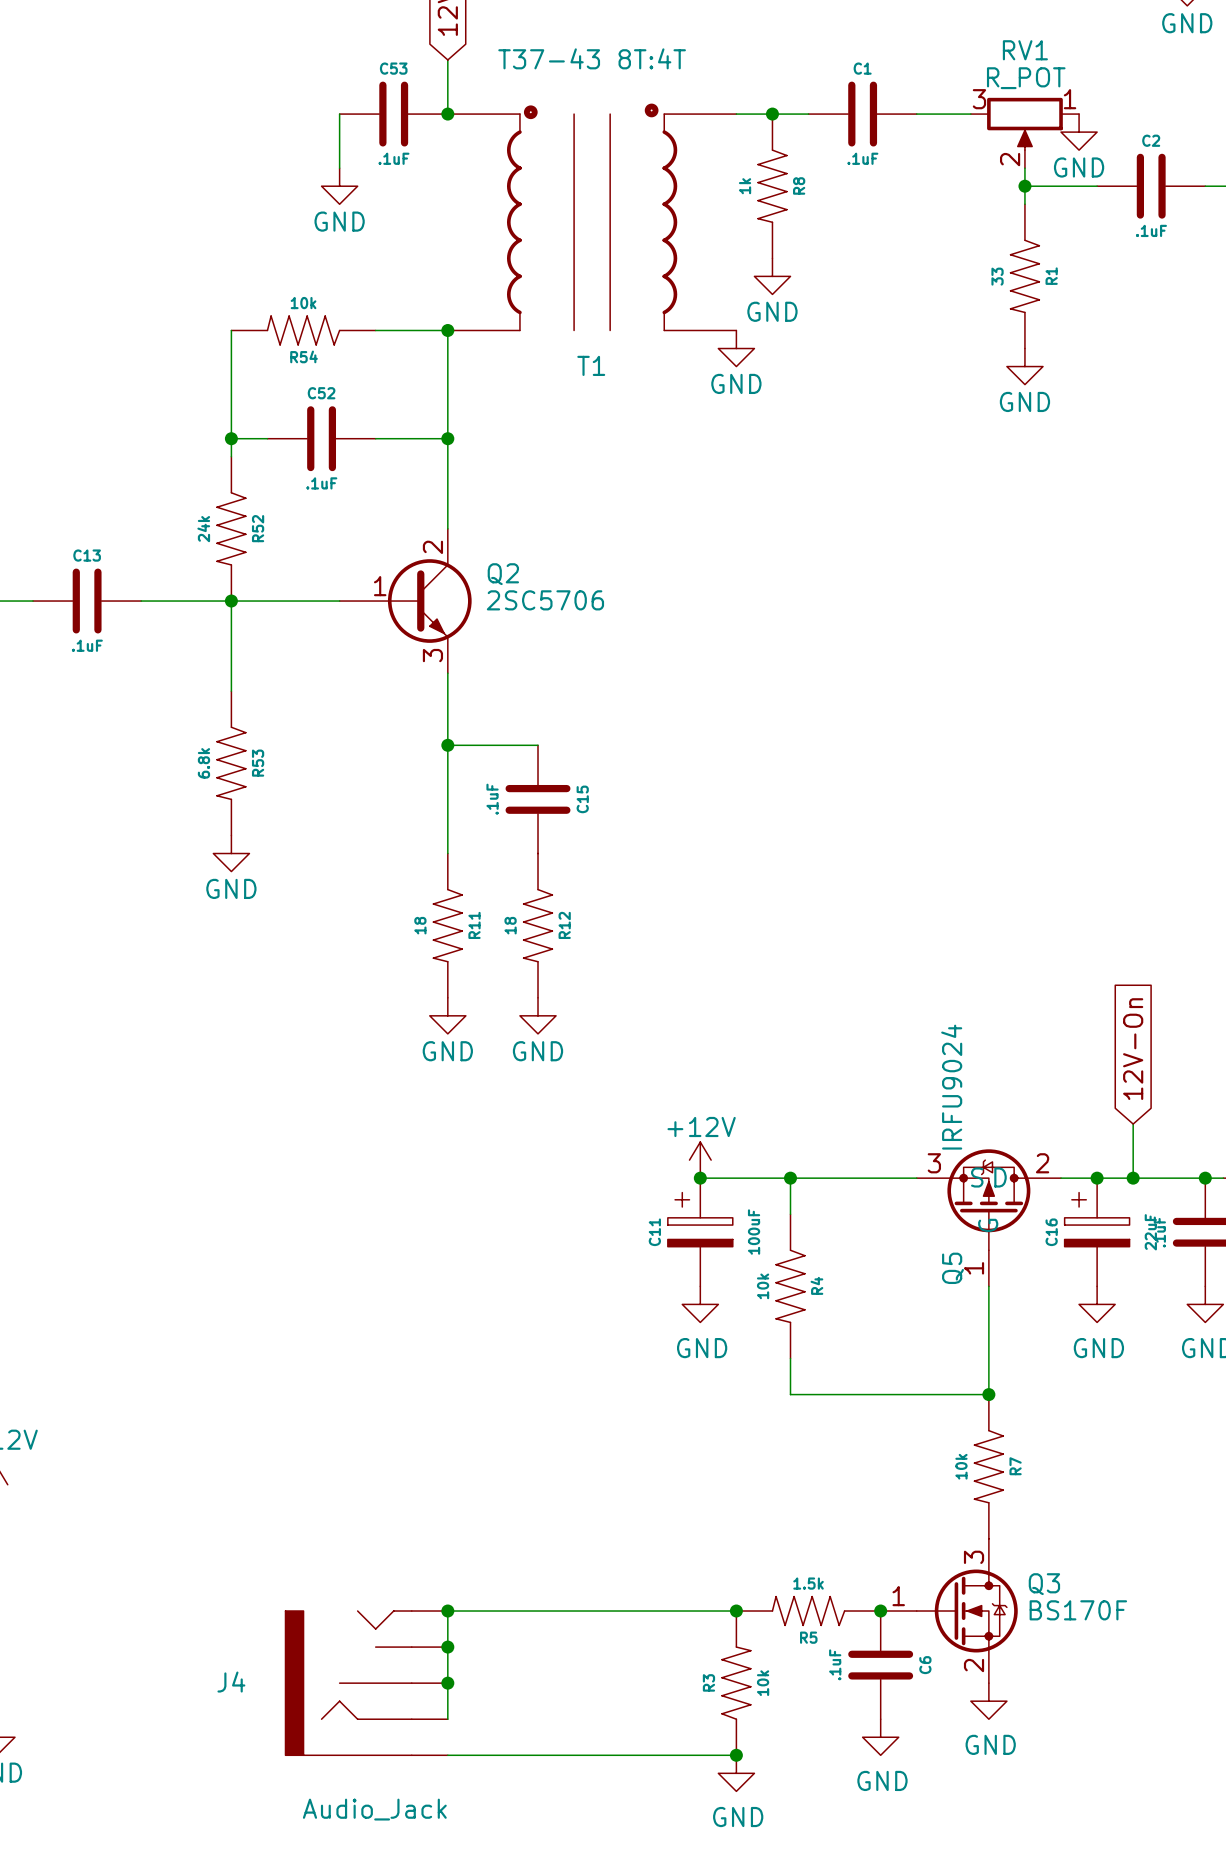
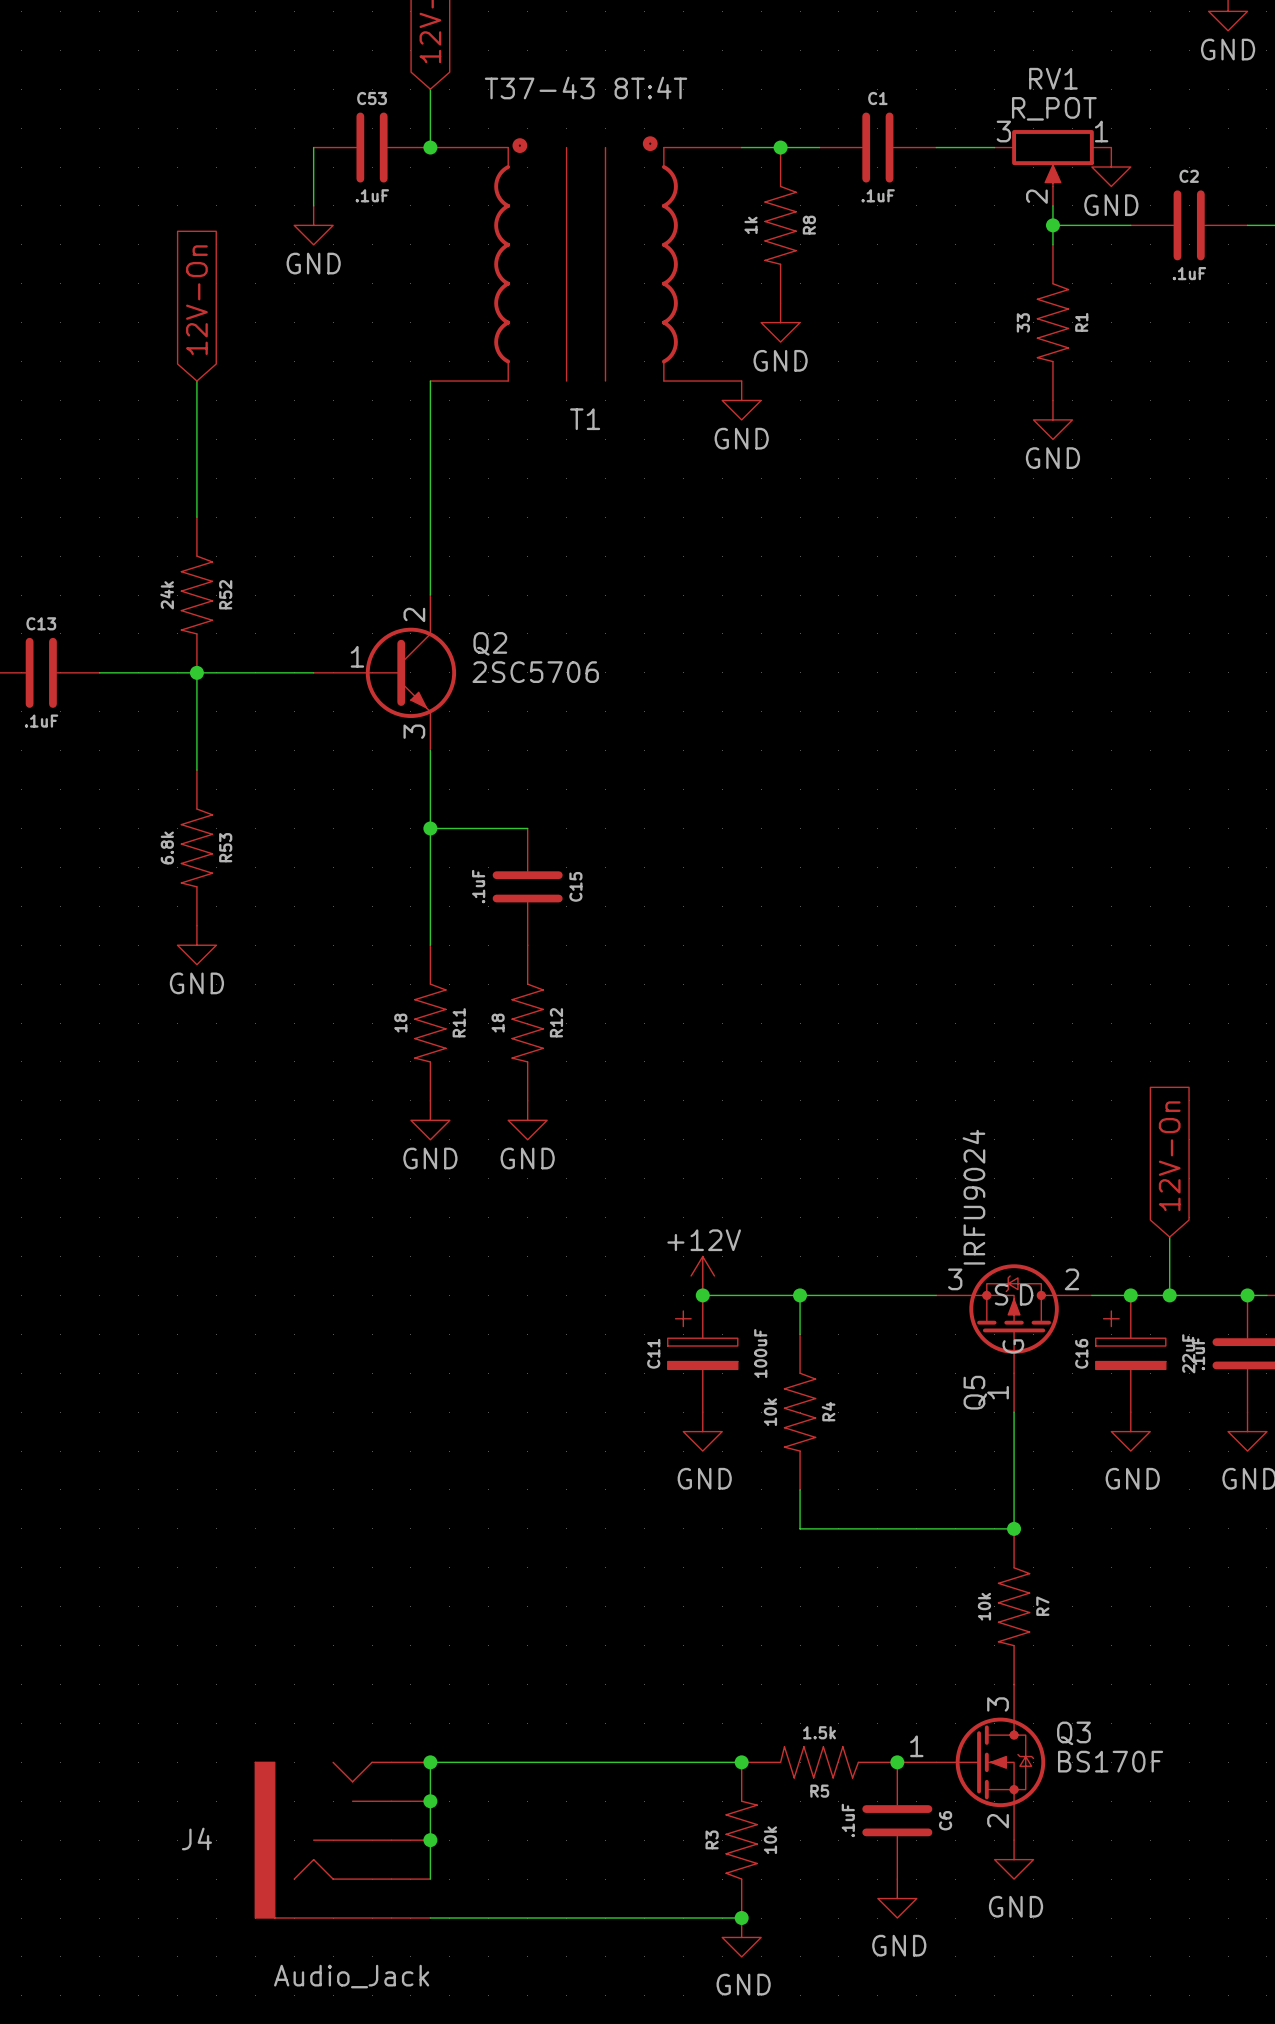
global label: none -> 12V-On (196, 300)
R54: 10k (303, 330) -> none
wire: (375, 330) (447, 330) -> none
junction: (447, 330) -> none
wire: (231, 438) (267, 438) -> none
junction: (231, 438) -> none
C52: .1uF (321, 438) -> none
wire: (375, 438) (447, 438) -> none
junction: (447, 438) -> none

